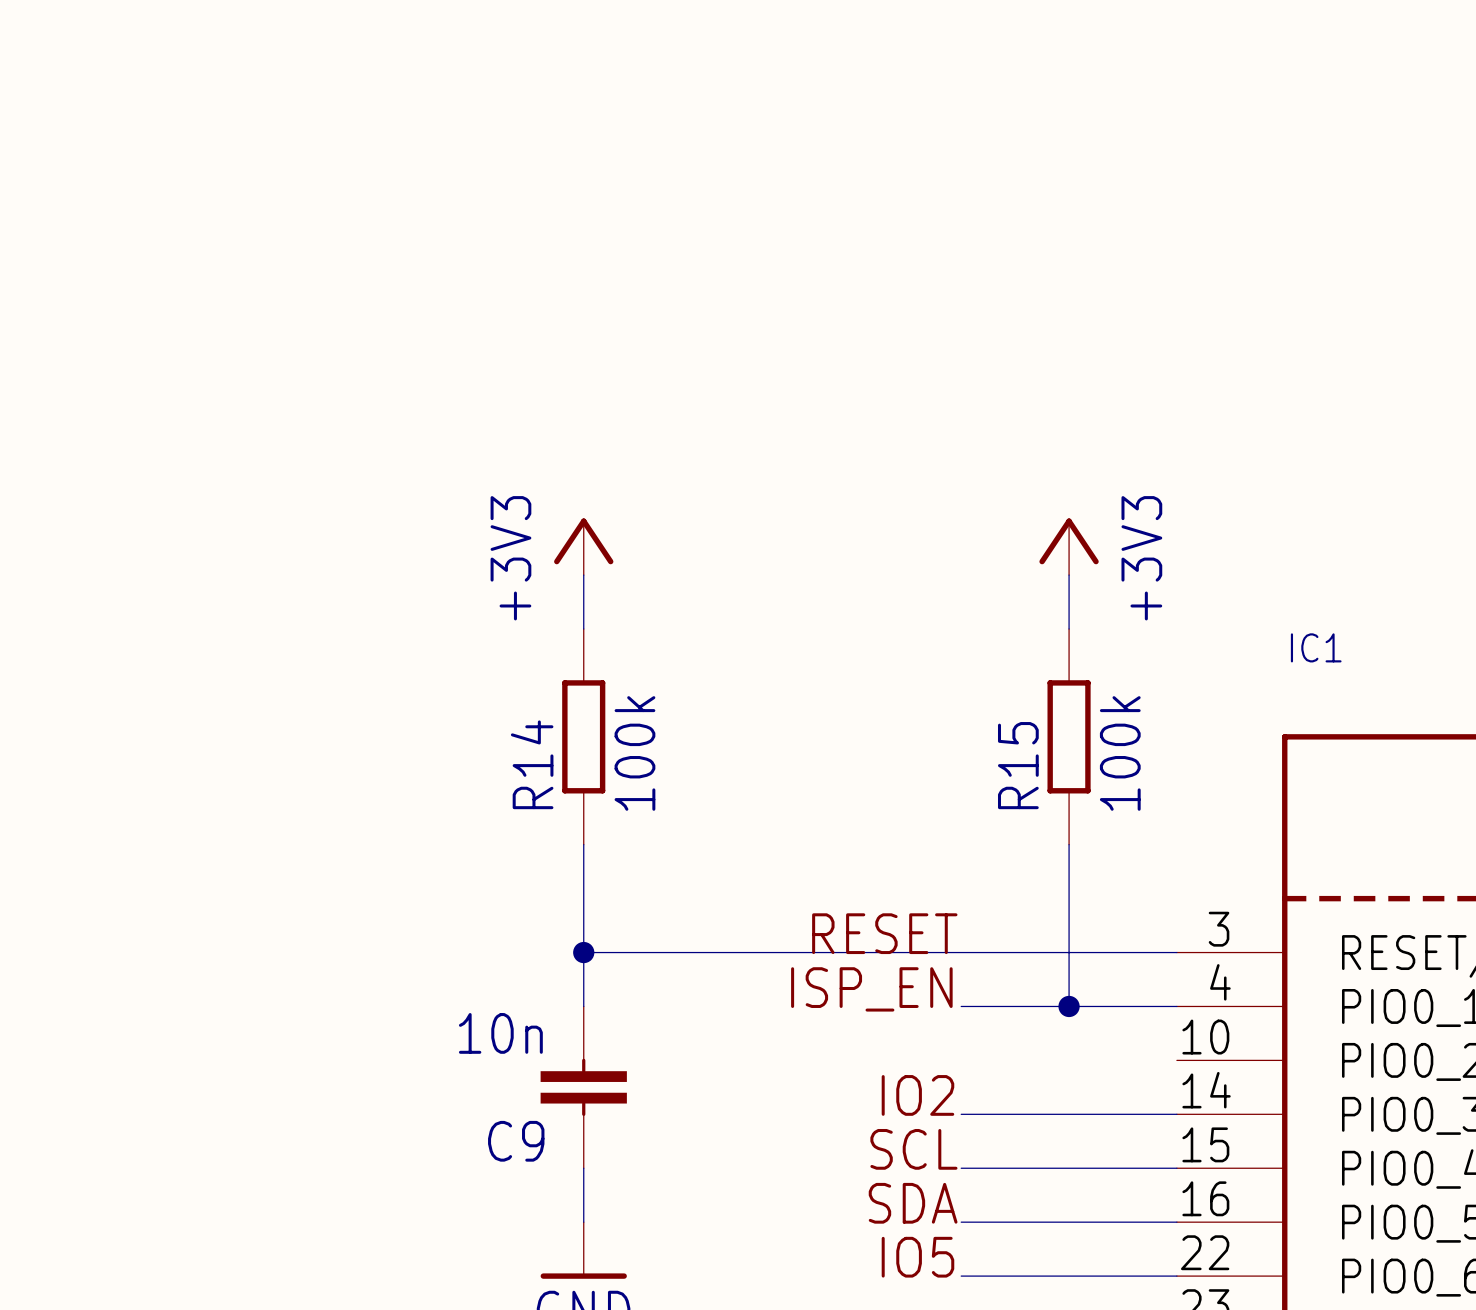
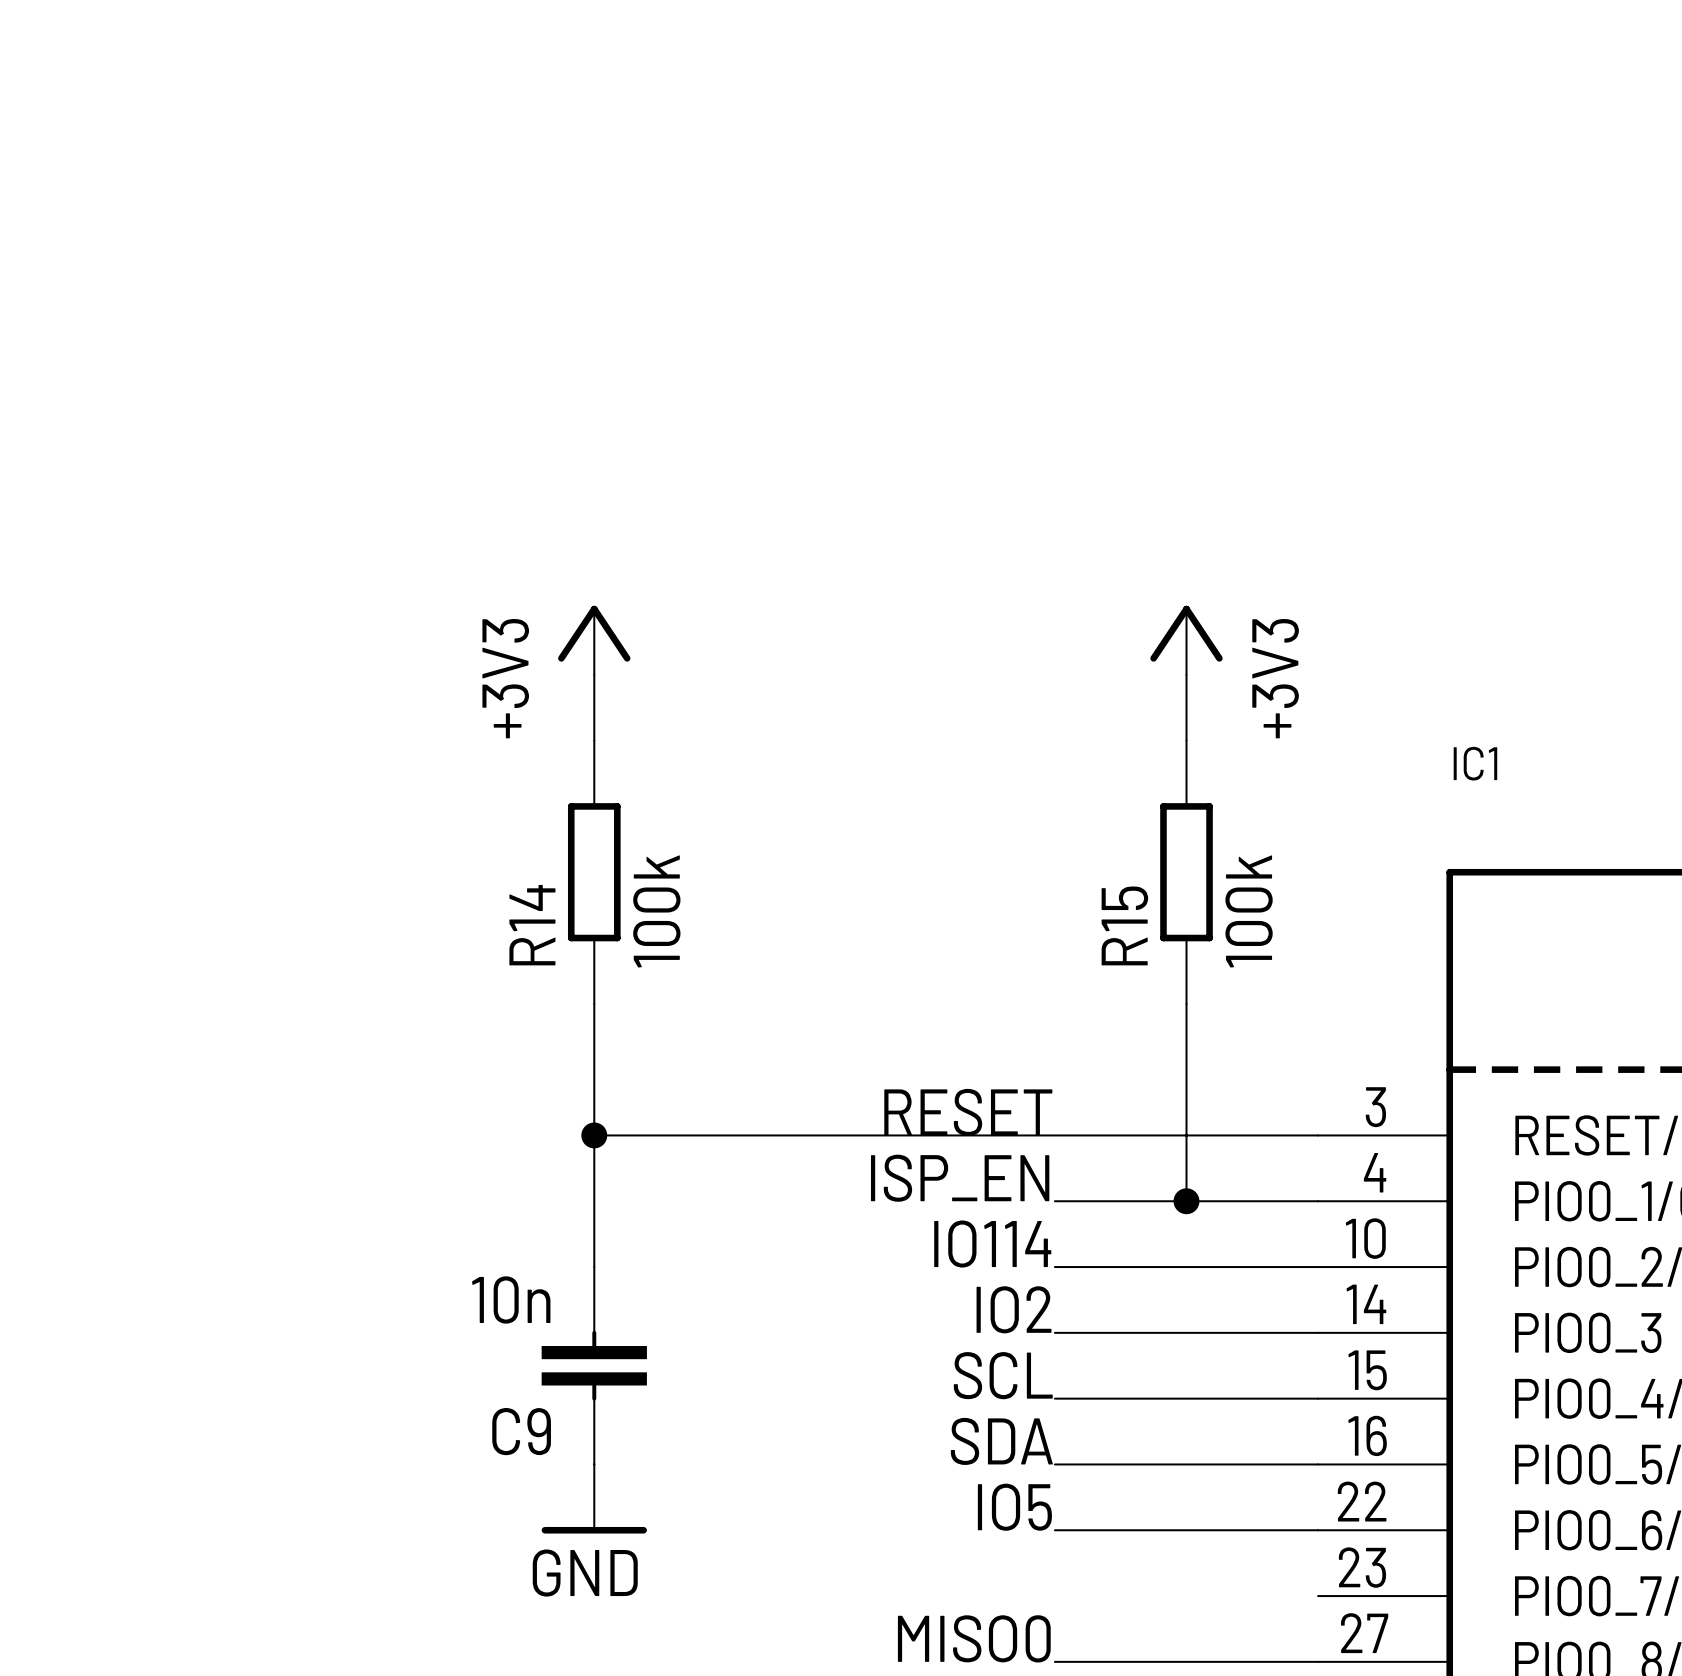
label: none -> IO114 (992, 1244)
wire: none -> (1054, 1267) (1318, 1267)
C9 position: (583, 1087) -> (594, 1365)

